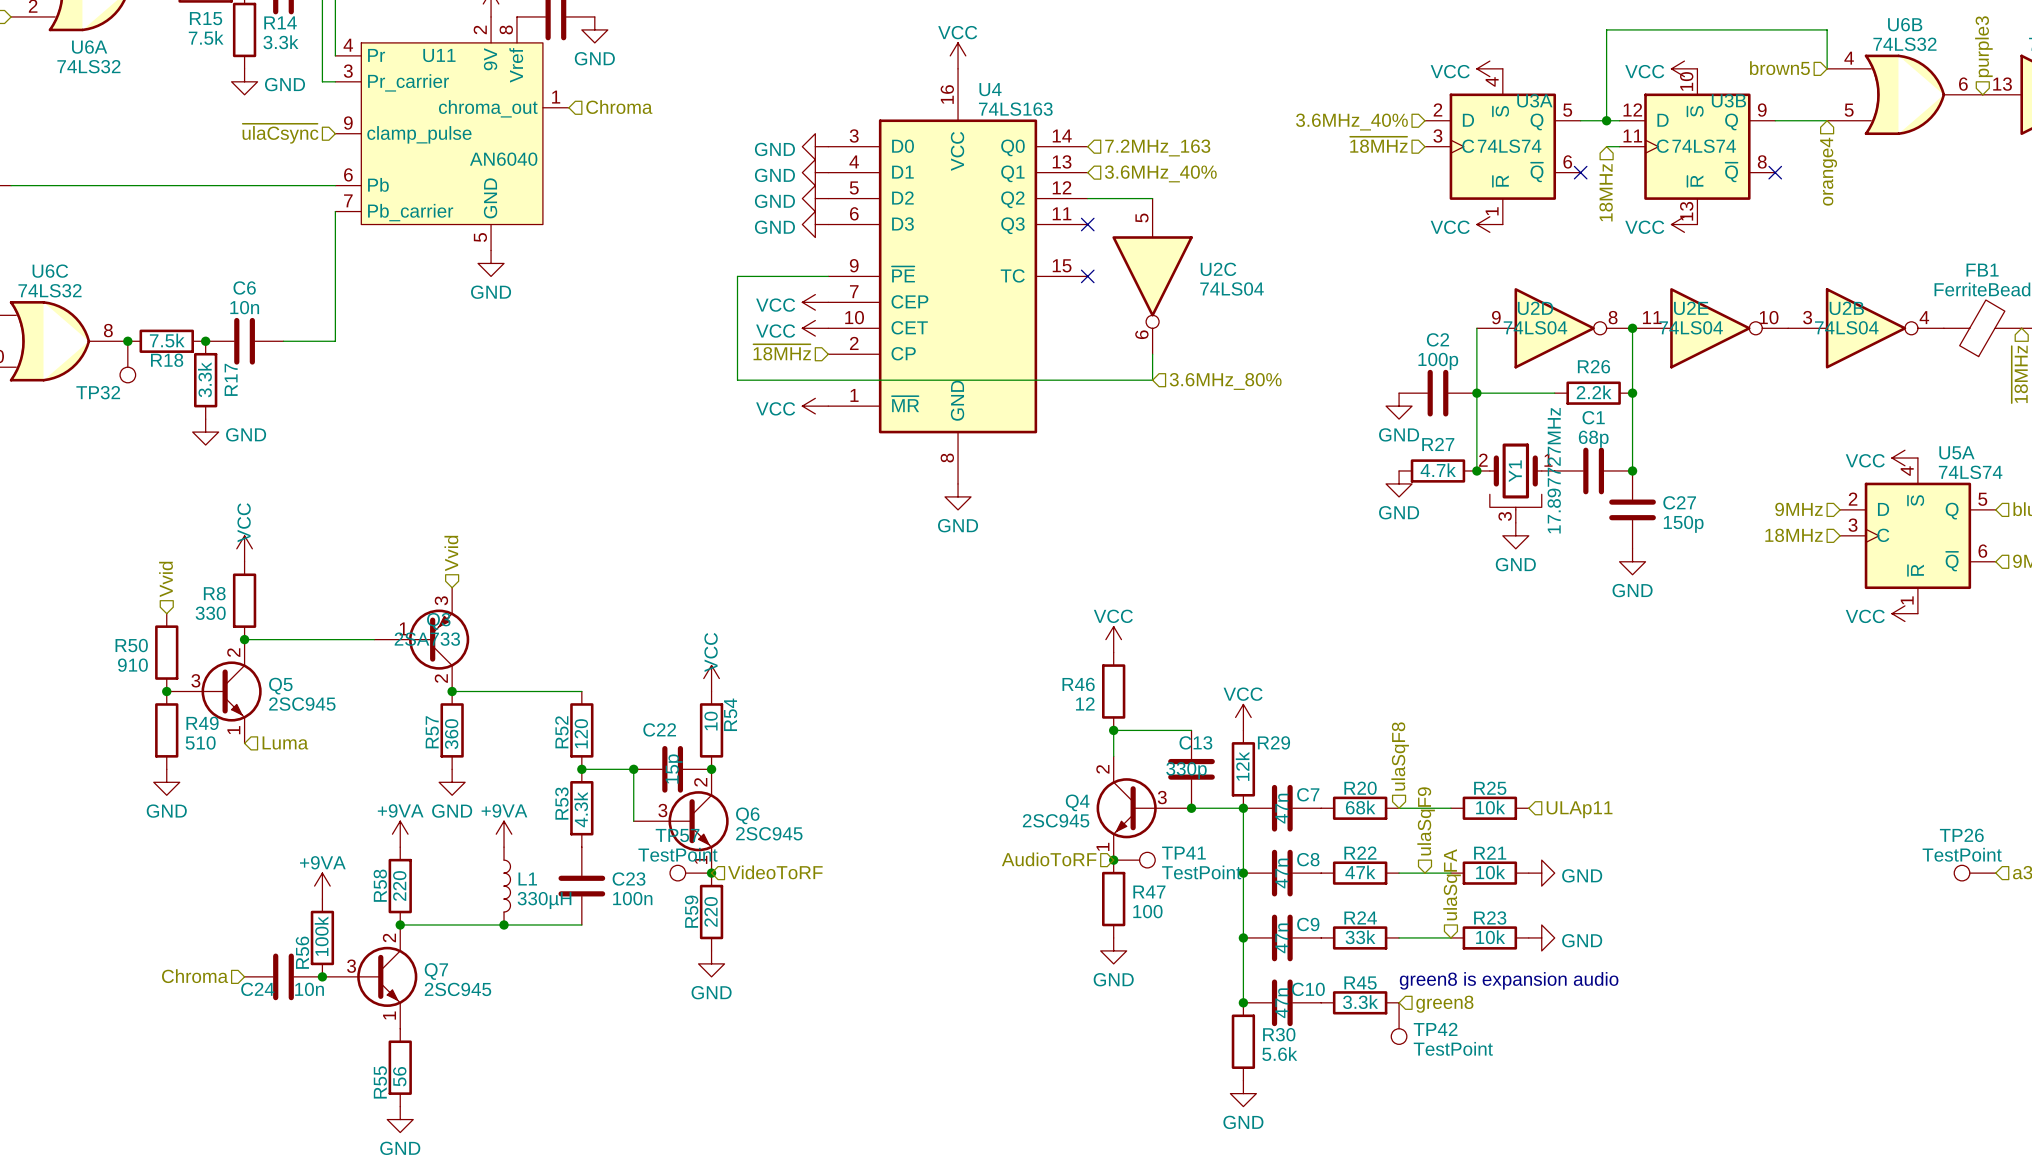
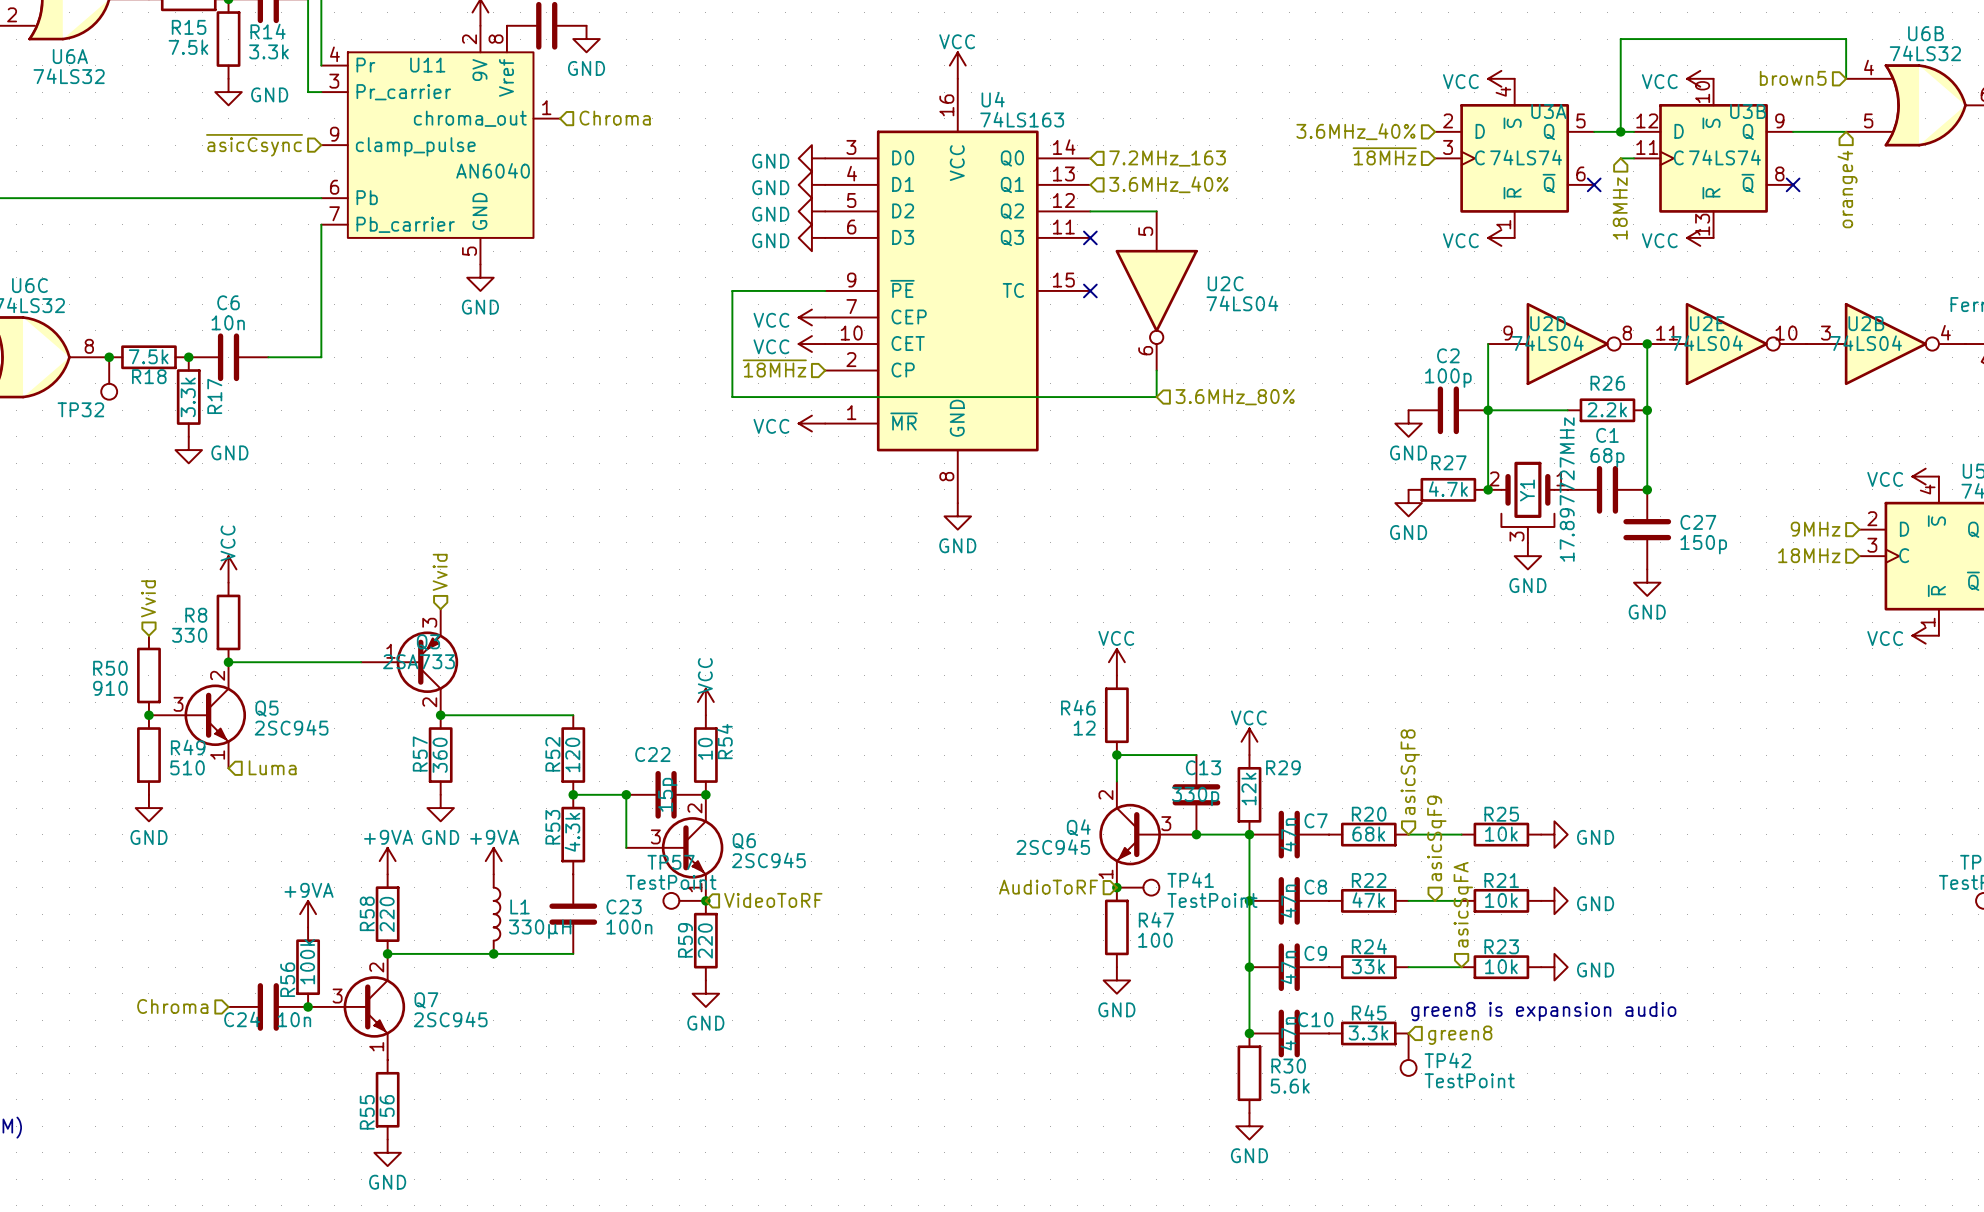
hierarchical label: ~{ulaCsync} (280, 133) -> ~{asicCsync} (254, 145)
hierarchical label: ulaSqF8 (1400, 756) -> asicSqF8 (1410, 772)
power symbol: none -> GND (1554, 834)
hierarchical label: ULAp11 (1579, 809) -> none
hierarchical label: ulaSqF9 (1426, 821) -> asicSqF9 (1436, 838)
hierarchical label: ulaSqFA (1452, 884) -> asicSqFA (1463, 904)

